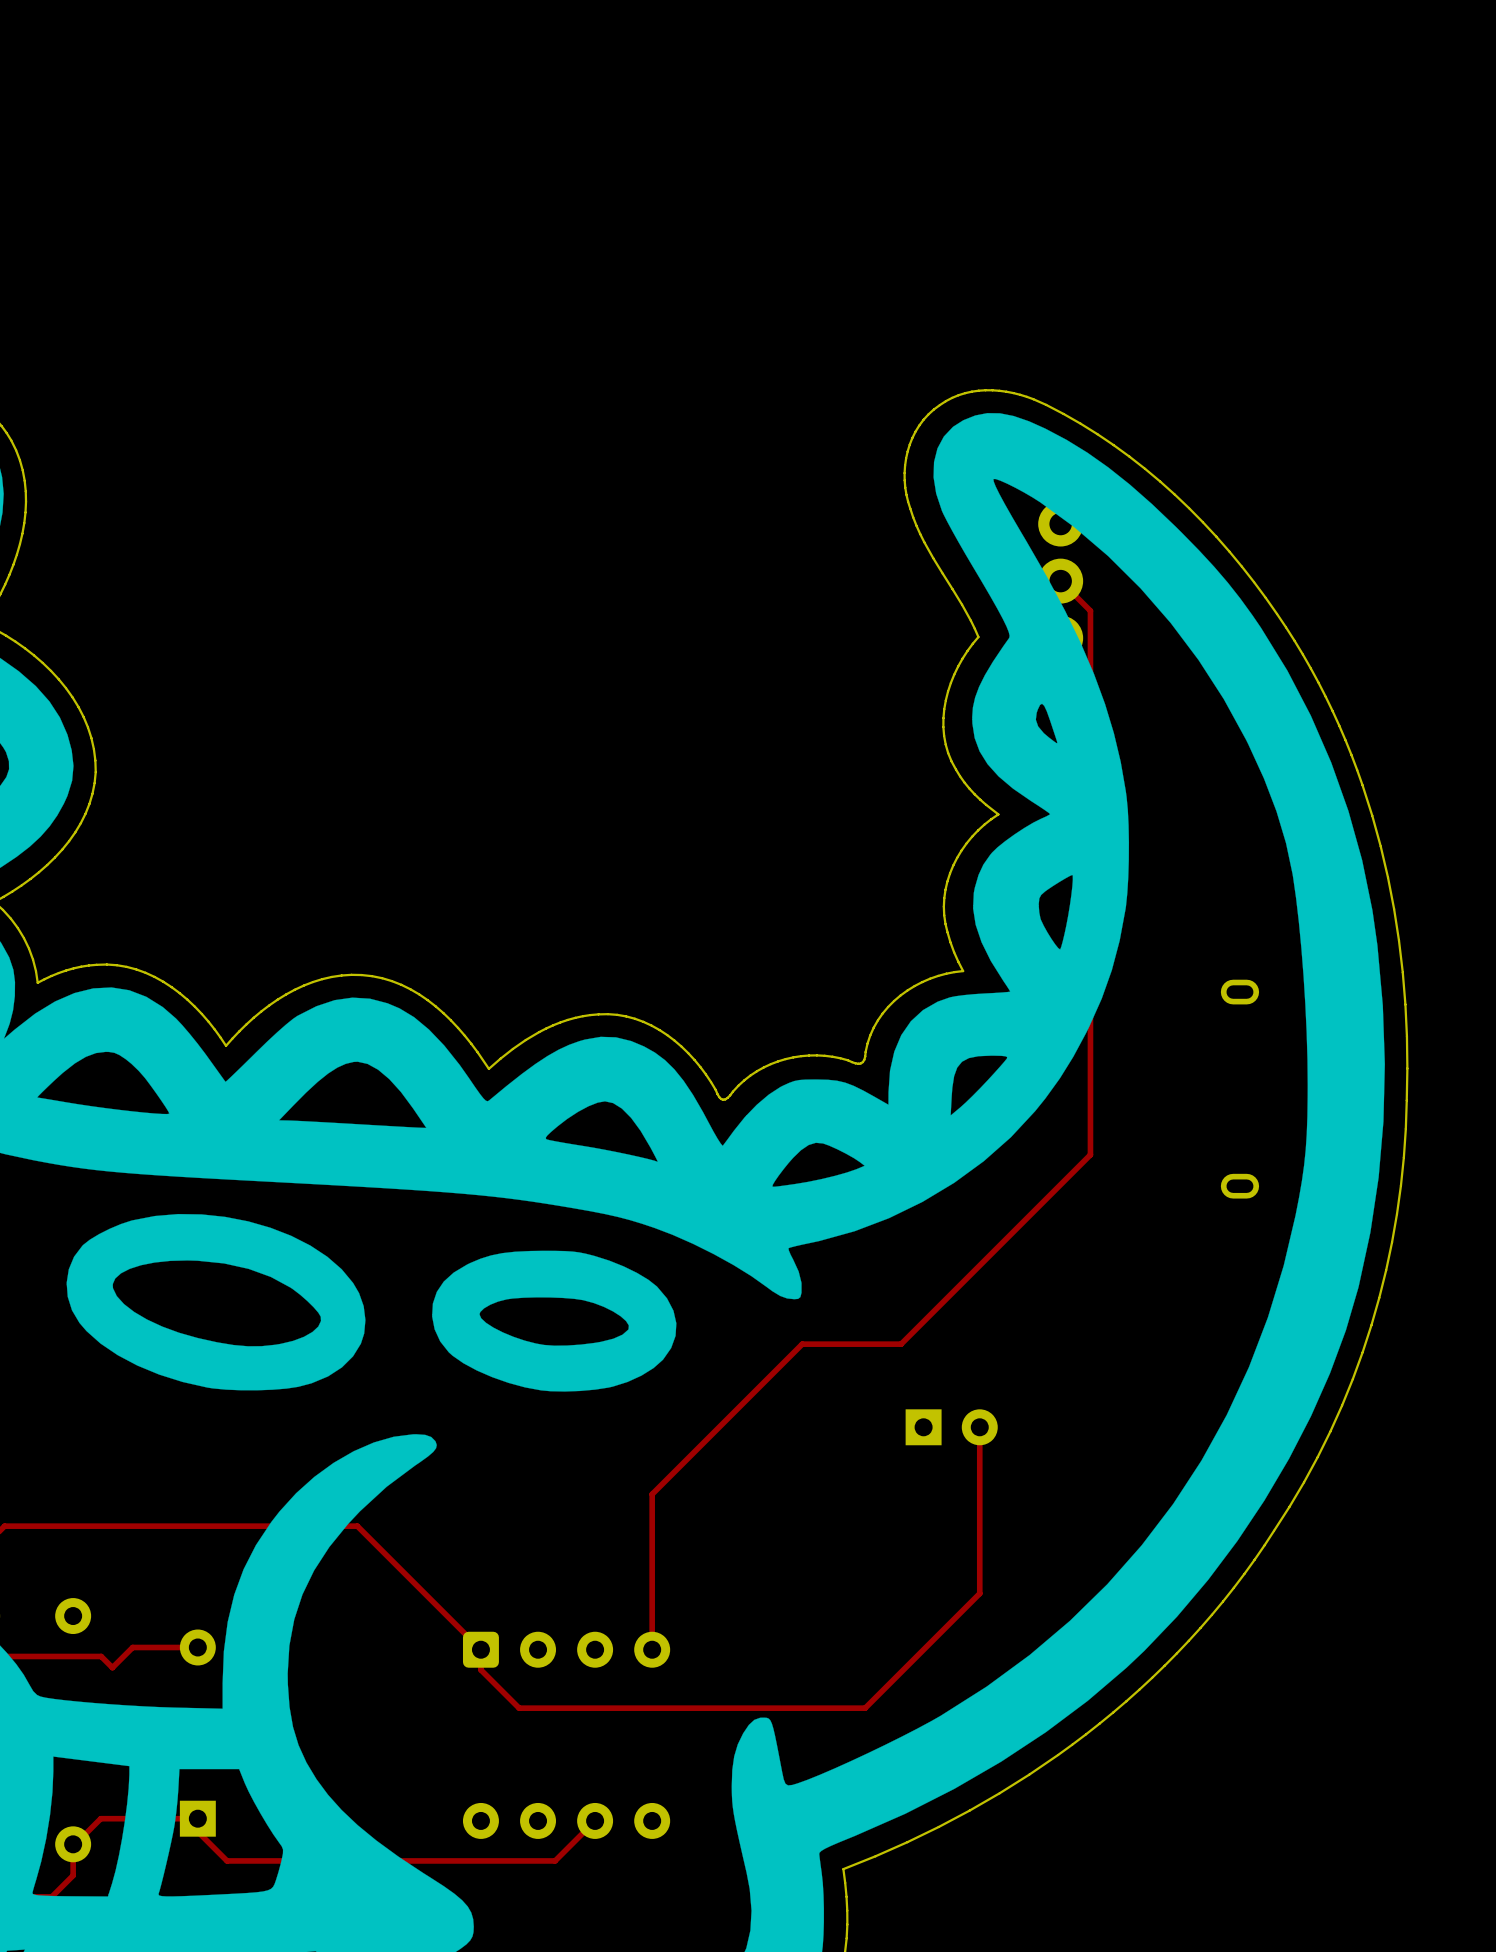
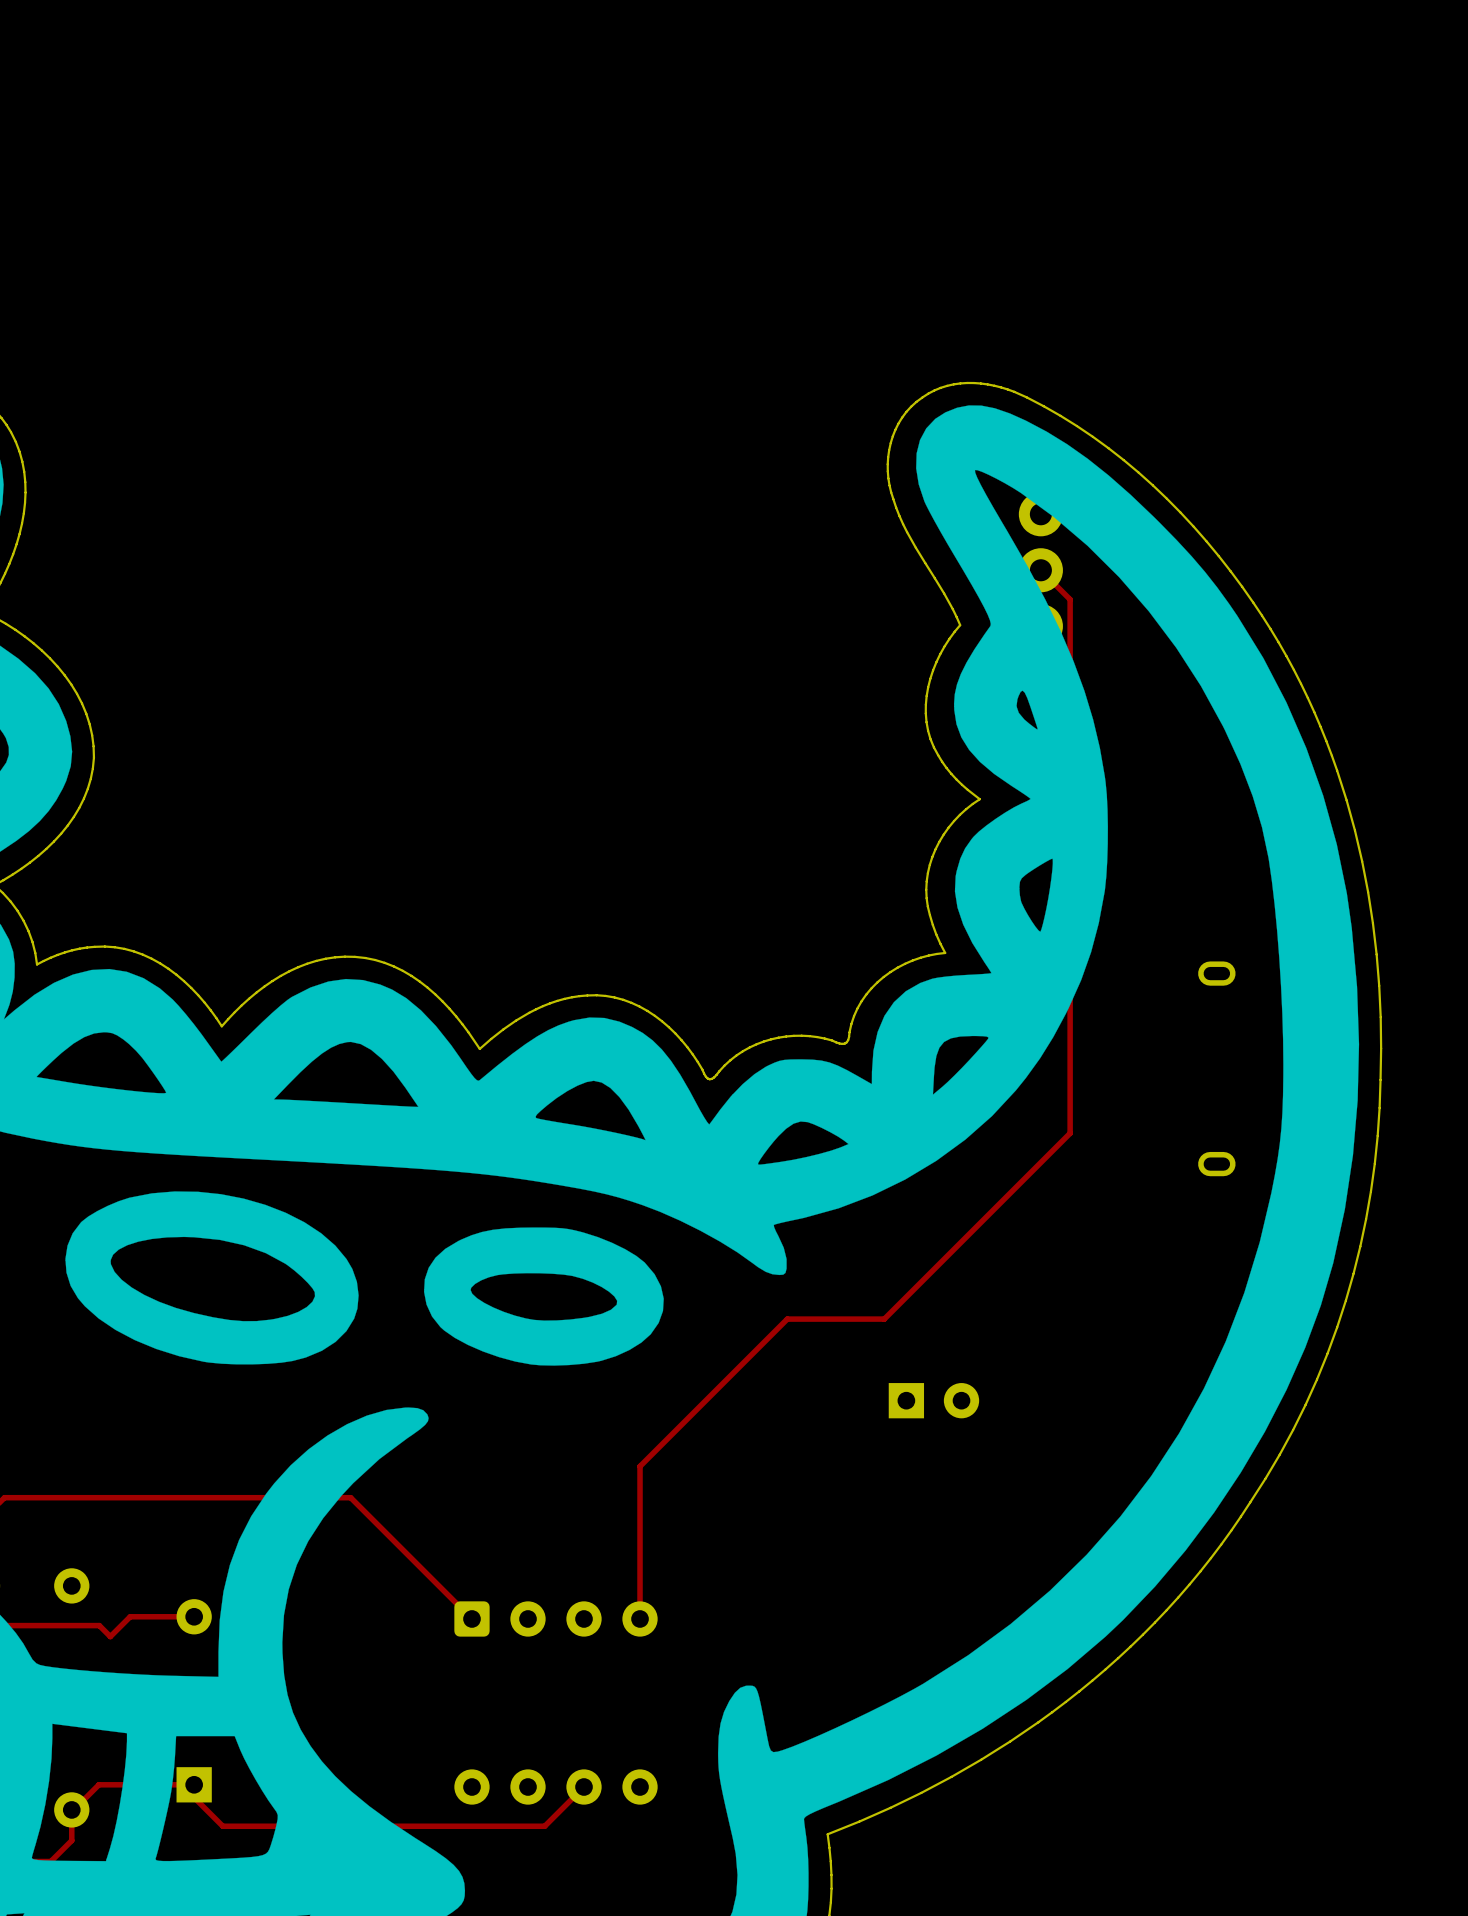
track: (979, 1427) (979, 1593) (865, 1708) (519, 1708) (480, 1669) (480, 1649) -> none

